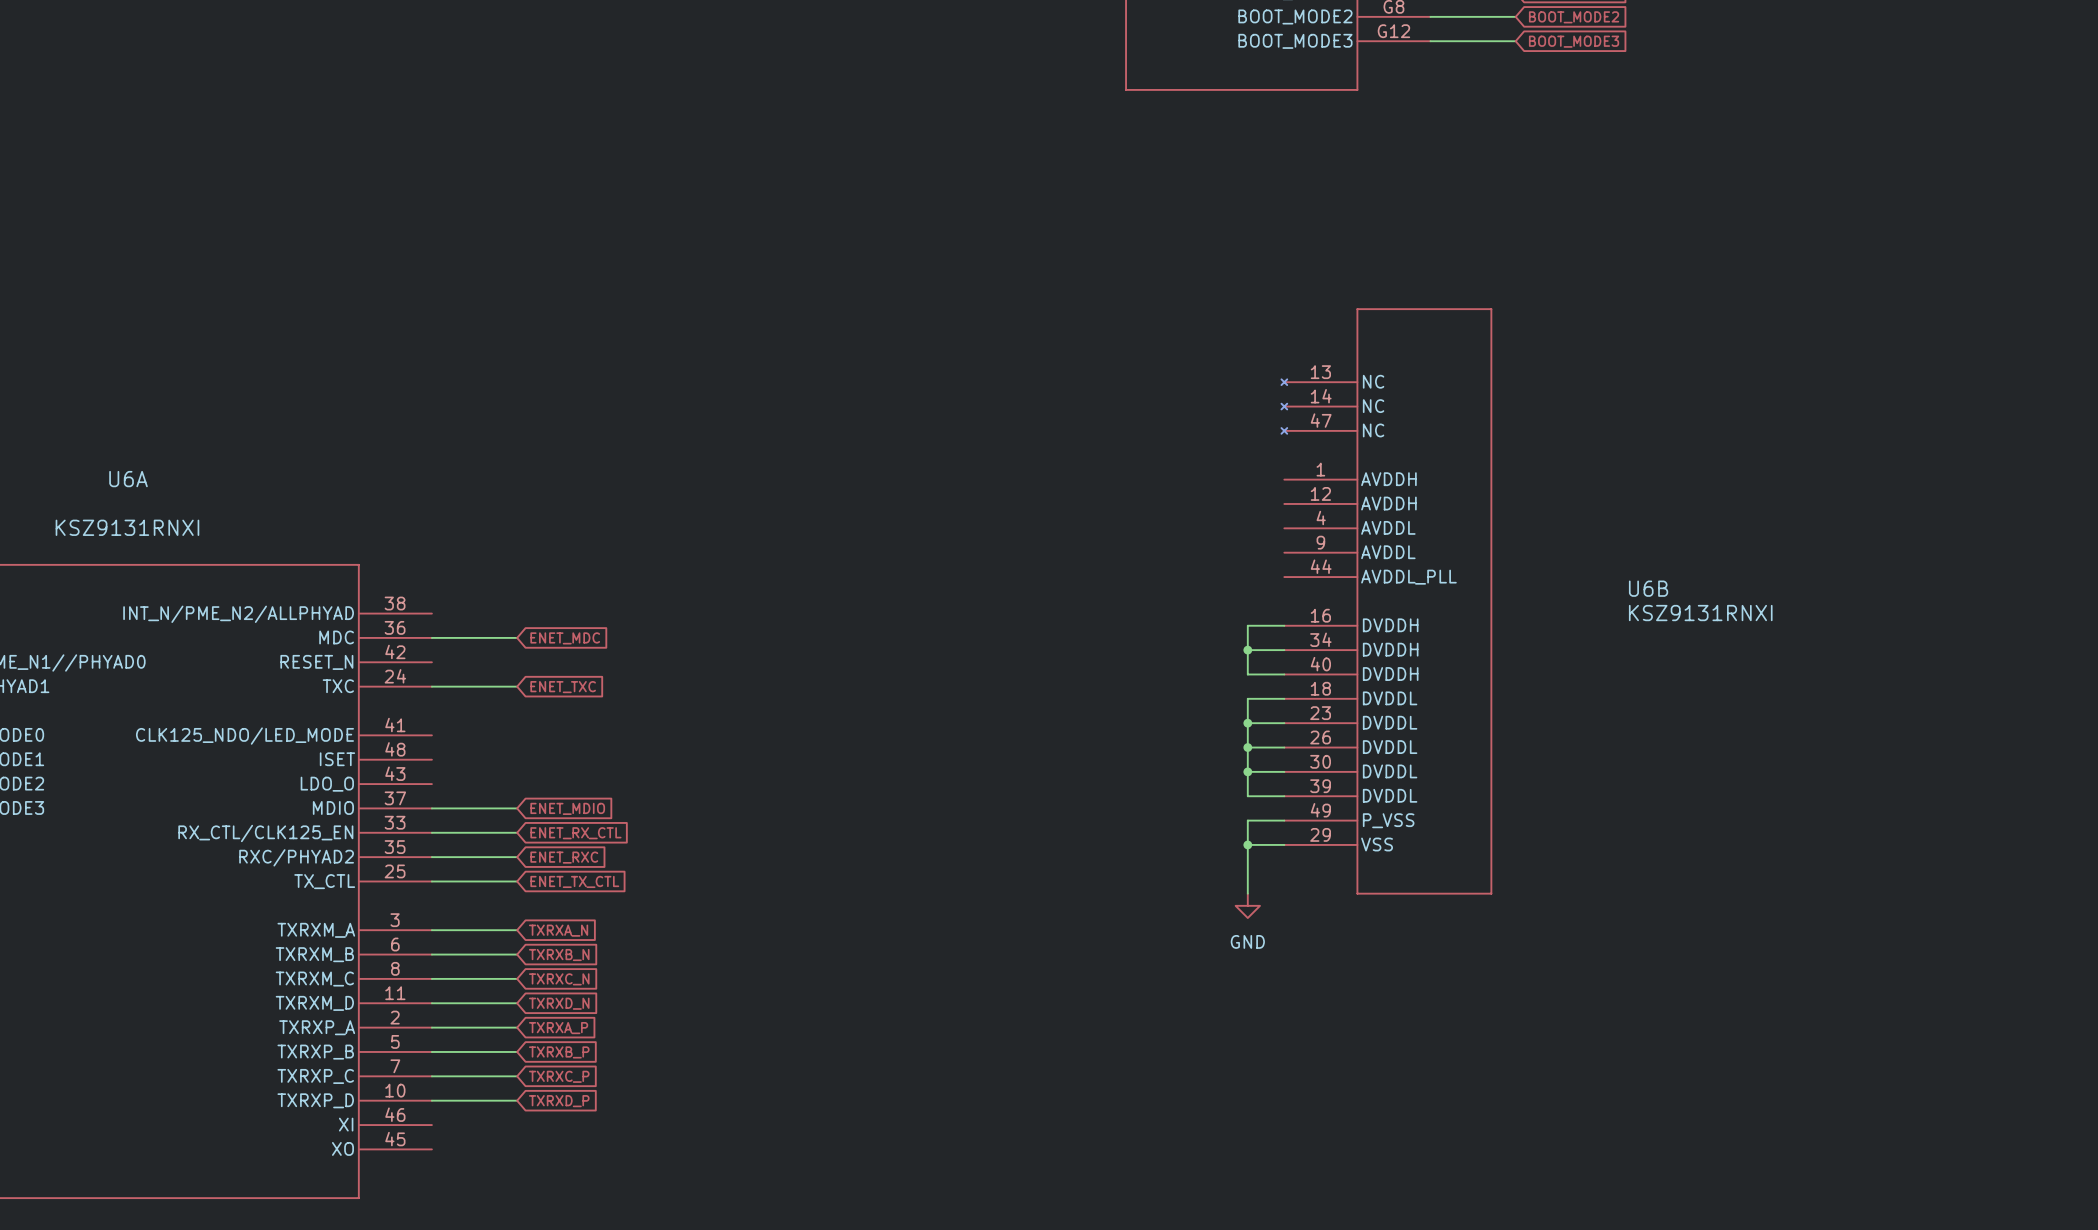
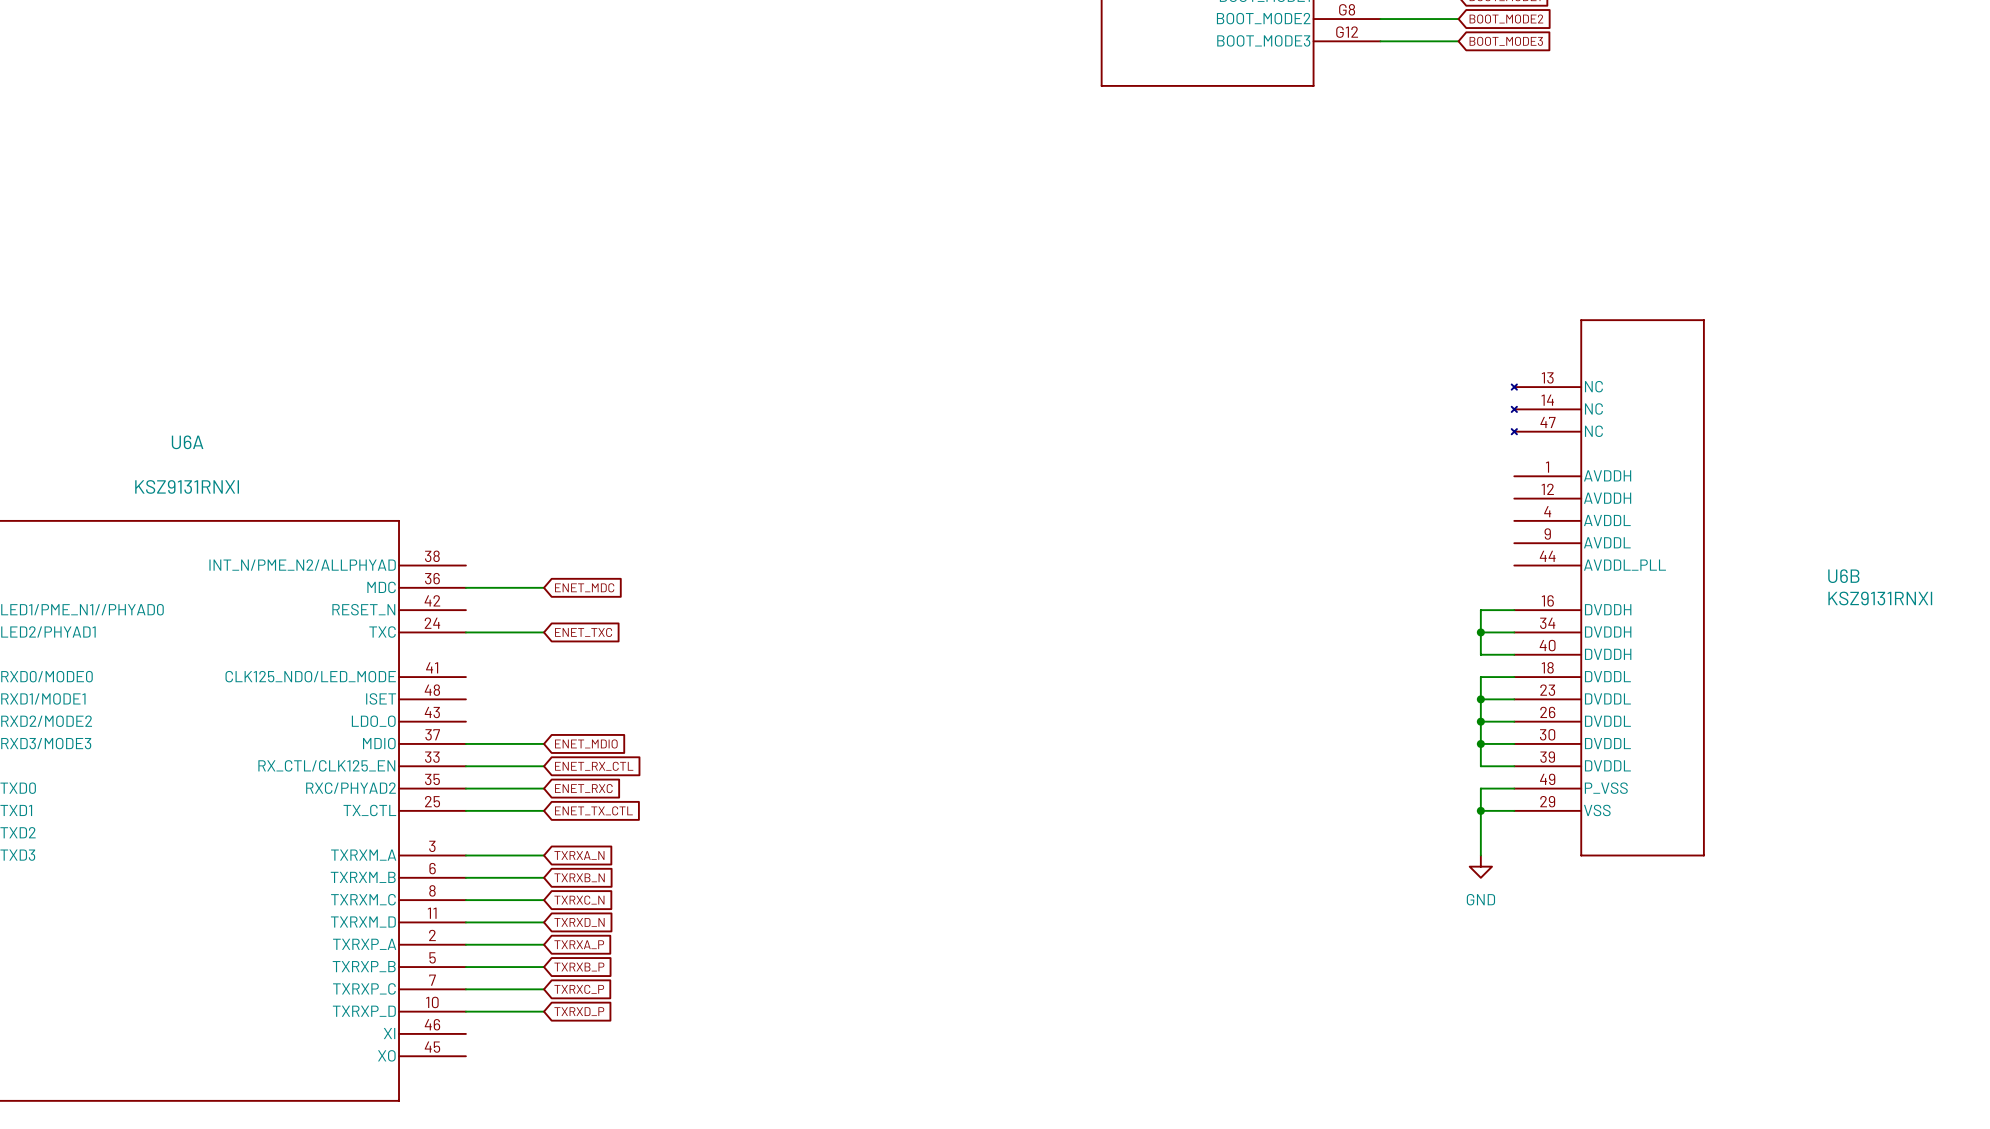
U6B position: (1386, 601) -> (1608, 587)
wire: (1284, 625) (1247, 625) (1247, 674) (1284, 674) -> none
wire: (1247, 650) (1284, 650) -> none
junction: (1247, 650) -> none
wire: none -> (1514, 610) (1480, 610) (1480, 654) (1514, 654)
wire: none -> (1480, 632) (1514, 632)
junction: none -> (1480, 632)
wire: (1284, 698) (1247, 698) (1247, 796) (1284, 796) -> none
wire: (1247, 723) (1284, 723) -> none
junction: (1247, 723) -> none
wire: none -> (1514, 677) (1480, 677) (1480, 766) (1514, 766)
wire: (1247, 747) (1284, 747) -> none
junction: (1247, 747) -> none
wire: none -> (1480, 699) (1514, 699)
junction: none -> (1480, 699)
wire: (1247, 771) (1284, 771) -> none
junction: (1247, 771) -> none
wire: none -> (1480, 721) (1514, 721)
junction: none -> (1480, 721)
wire: none -> (1480, 743) (1514, 743)
junction: none -> (1480, 743)
wire: (1284, 820) (1247, 820) (1247, 893) -> none
wire: (1247, 844) (1284, 844) -> none
junction: (1247, 844) -> none
wire: none -> (1514, 788) (1480, 788) (1480, 855)
wire: none -> (1480, 810) (1514, 810)
junction: none -> (1480, 810)
power symbol: GND (1247, 905) -> none
power symbol: none -> GND (1480, 866)

